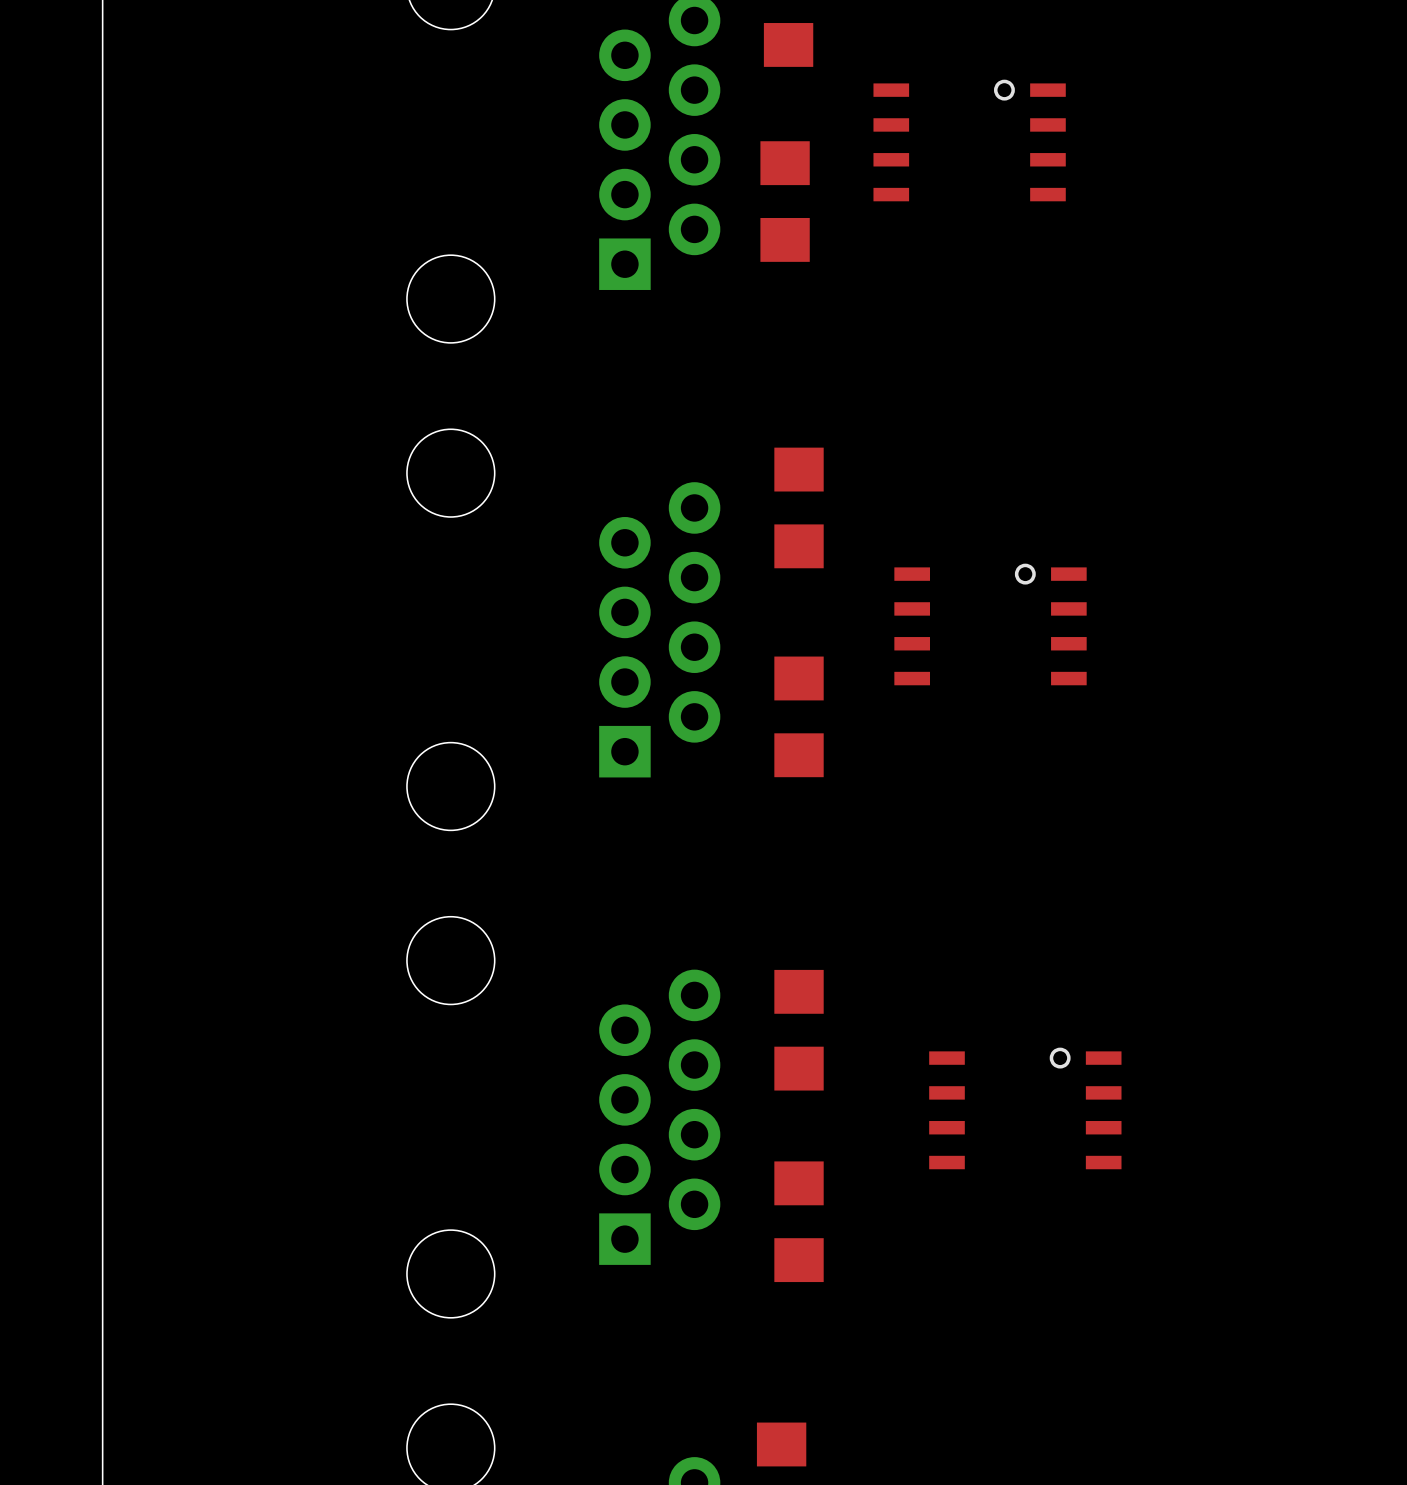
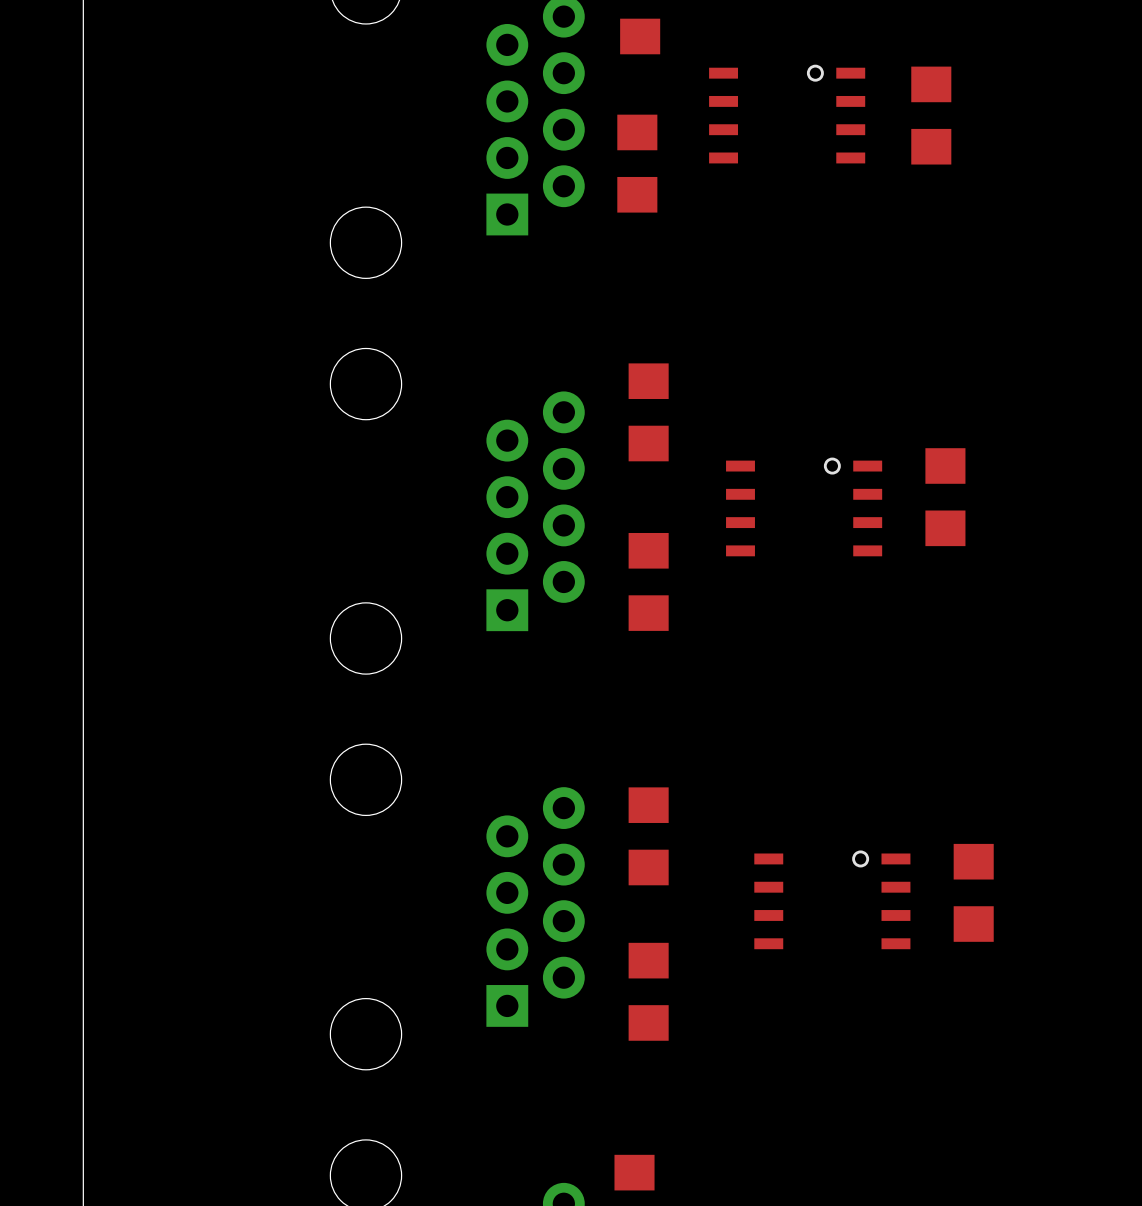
part: none -> (931, 115)
part: none -> (945, 497)
part: none -> (973, 892)

